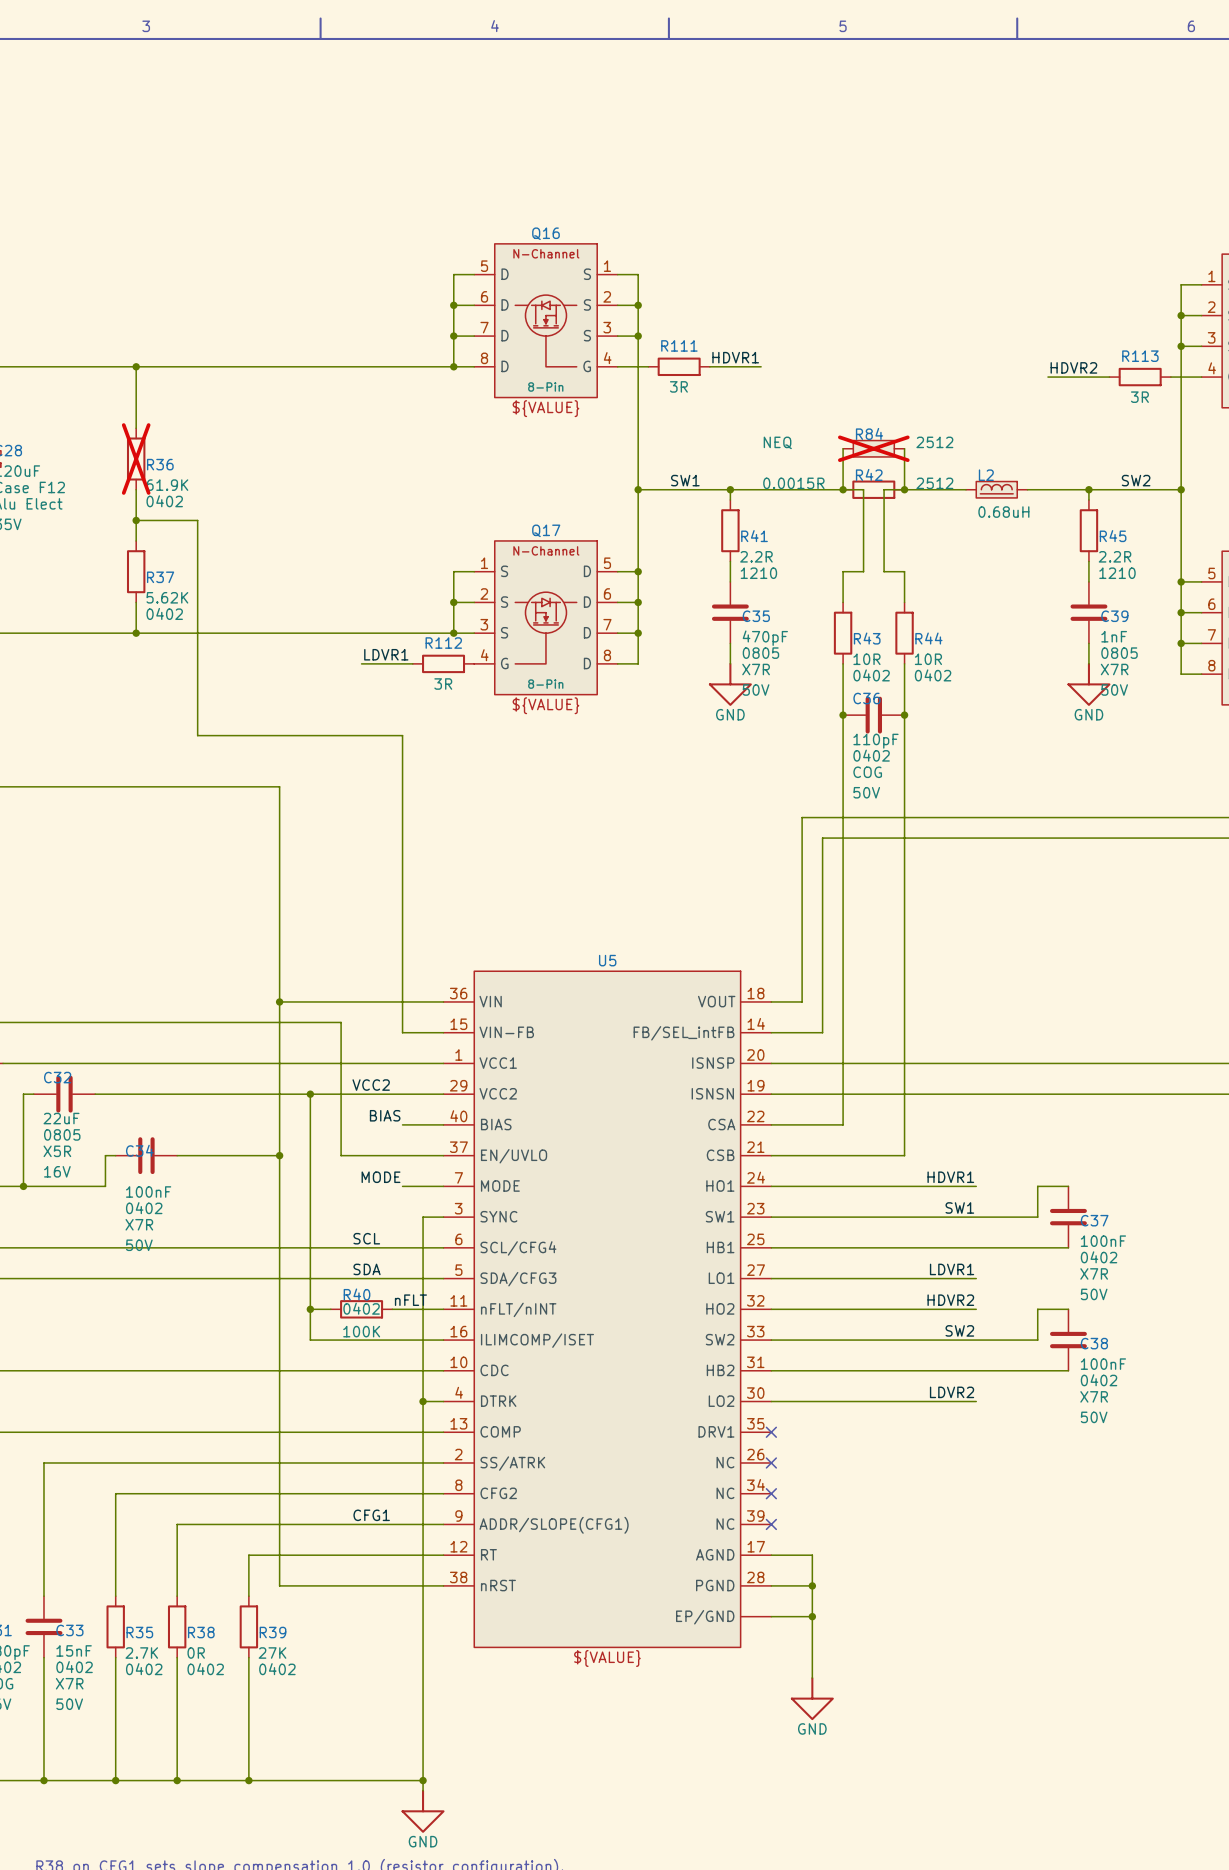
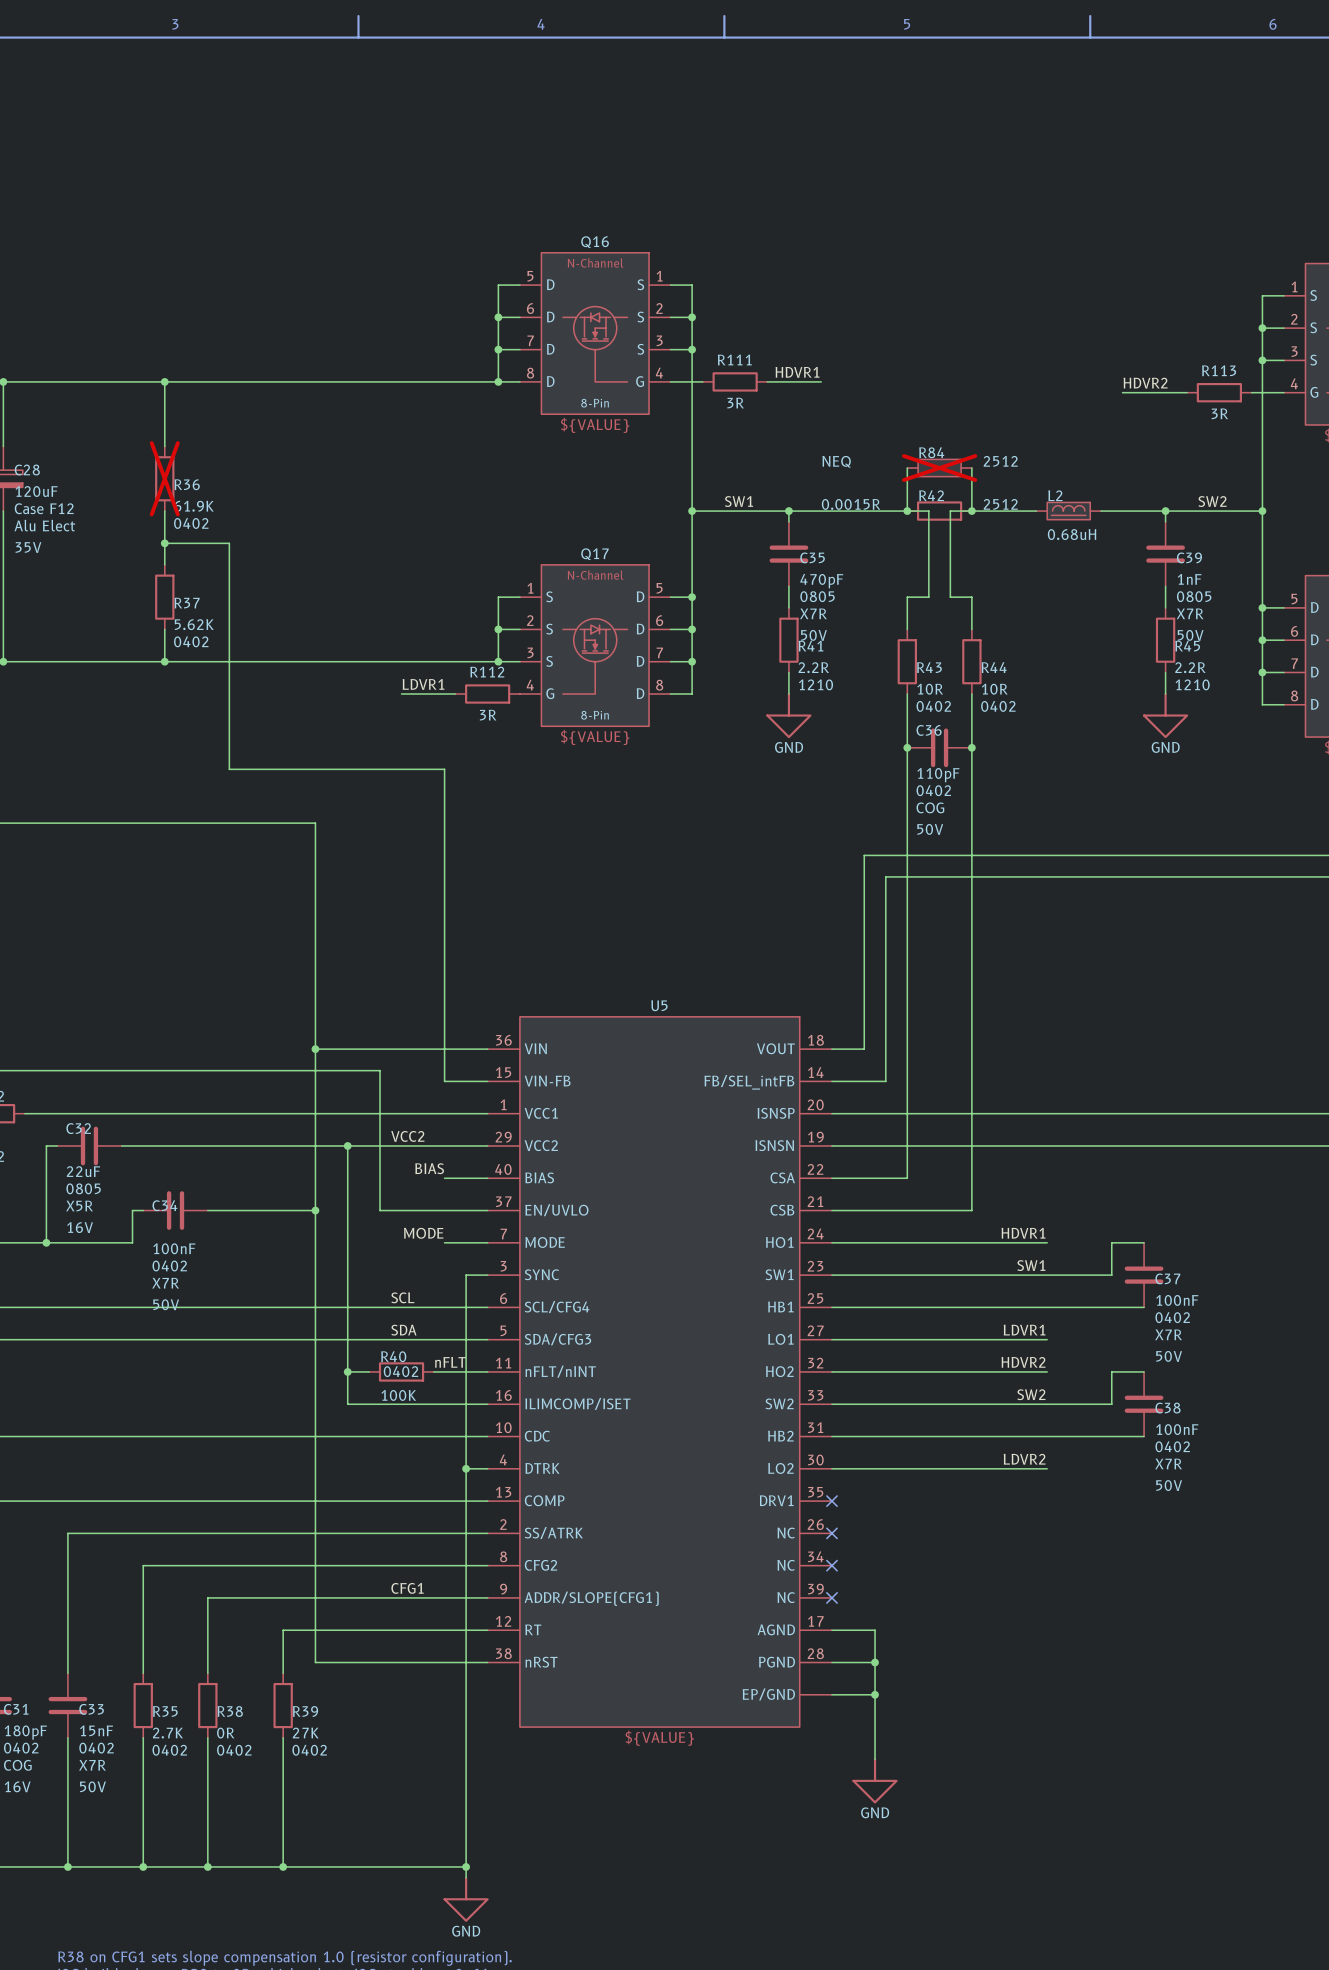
R41 position: (730, 530) -> (788, 640)
R45 position: (1088, 530) -> (1165, 640)
C35 position: (730, 612) -> (788, 554)
C39 position: (1088, 612) -> (1165, 554)

